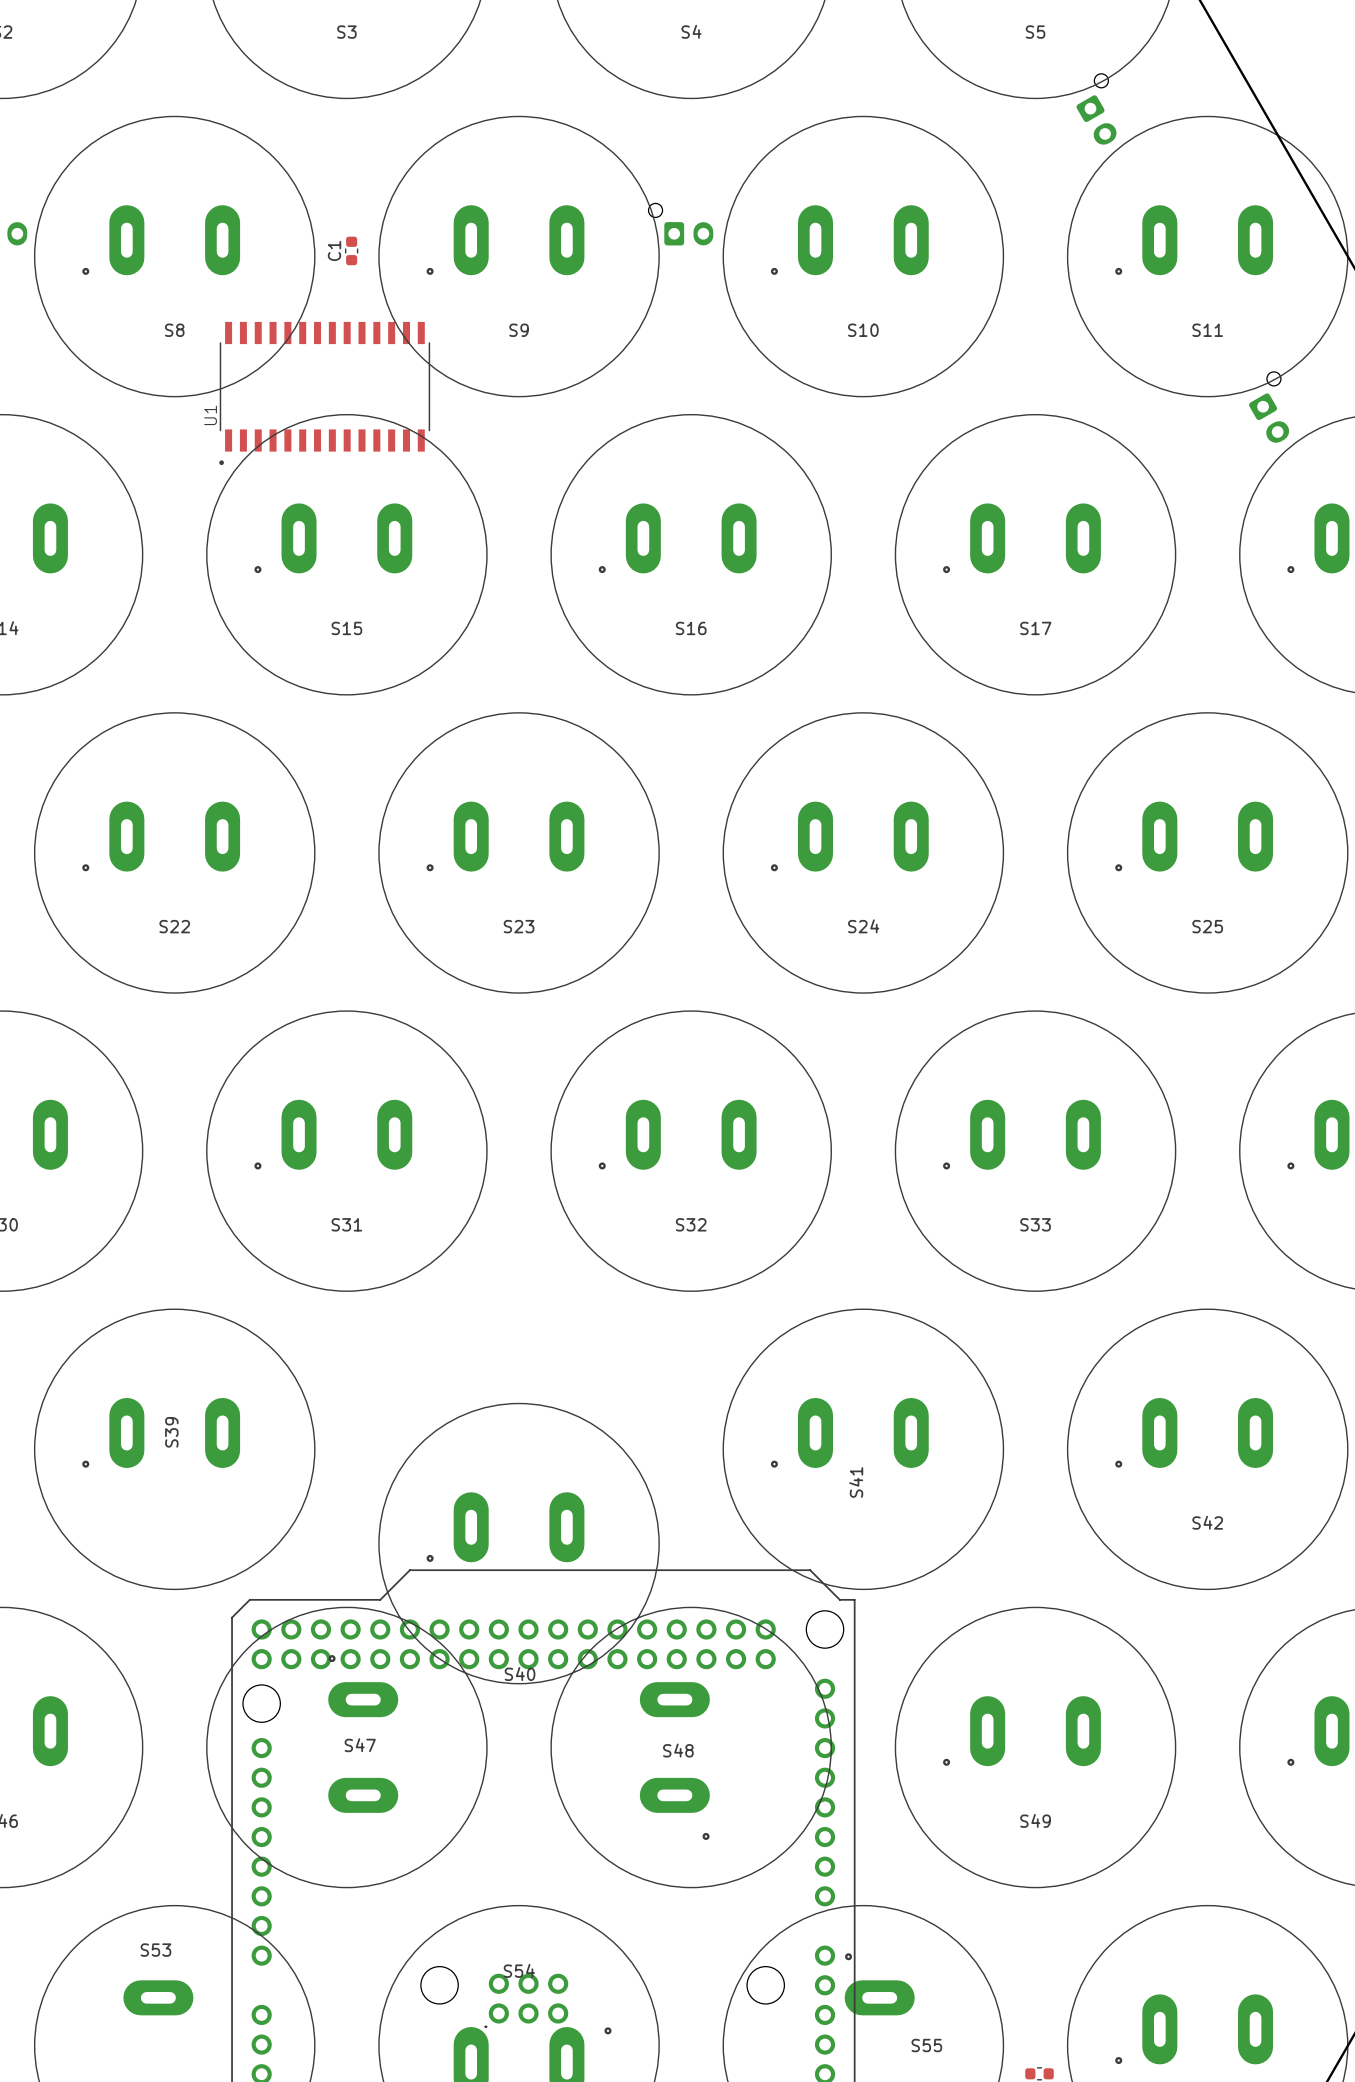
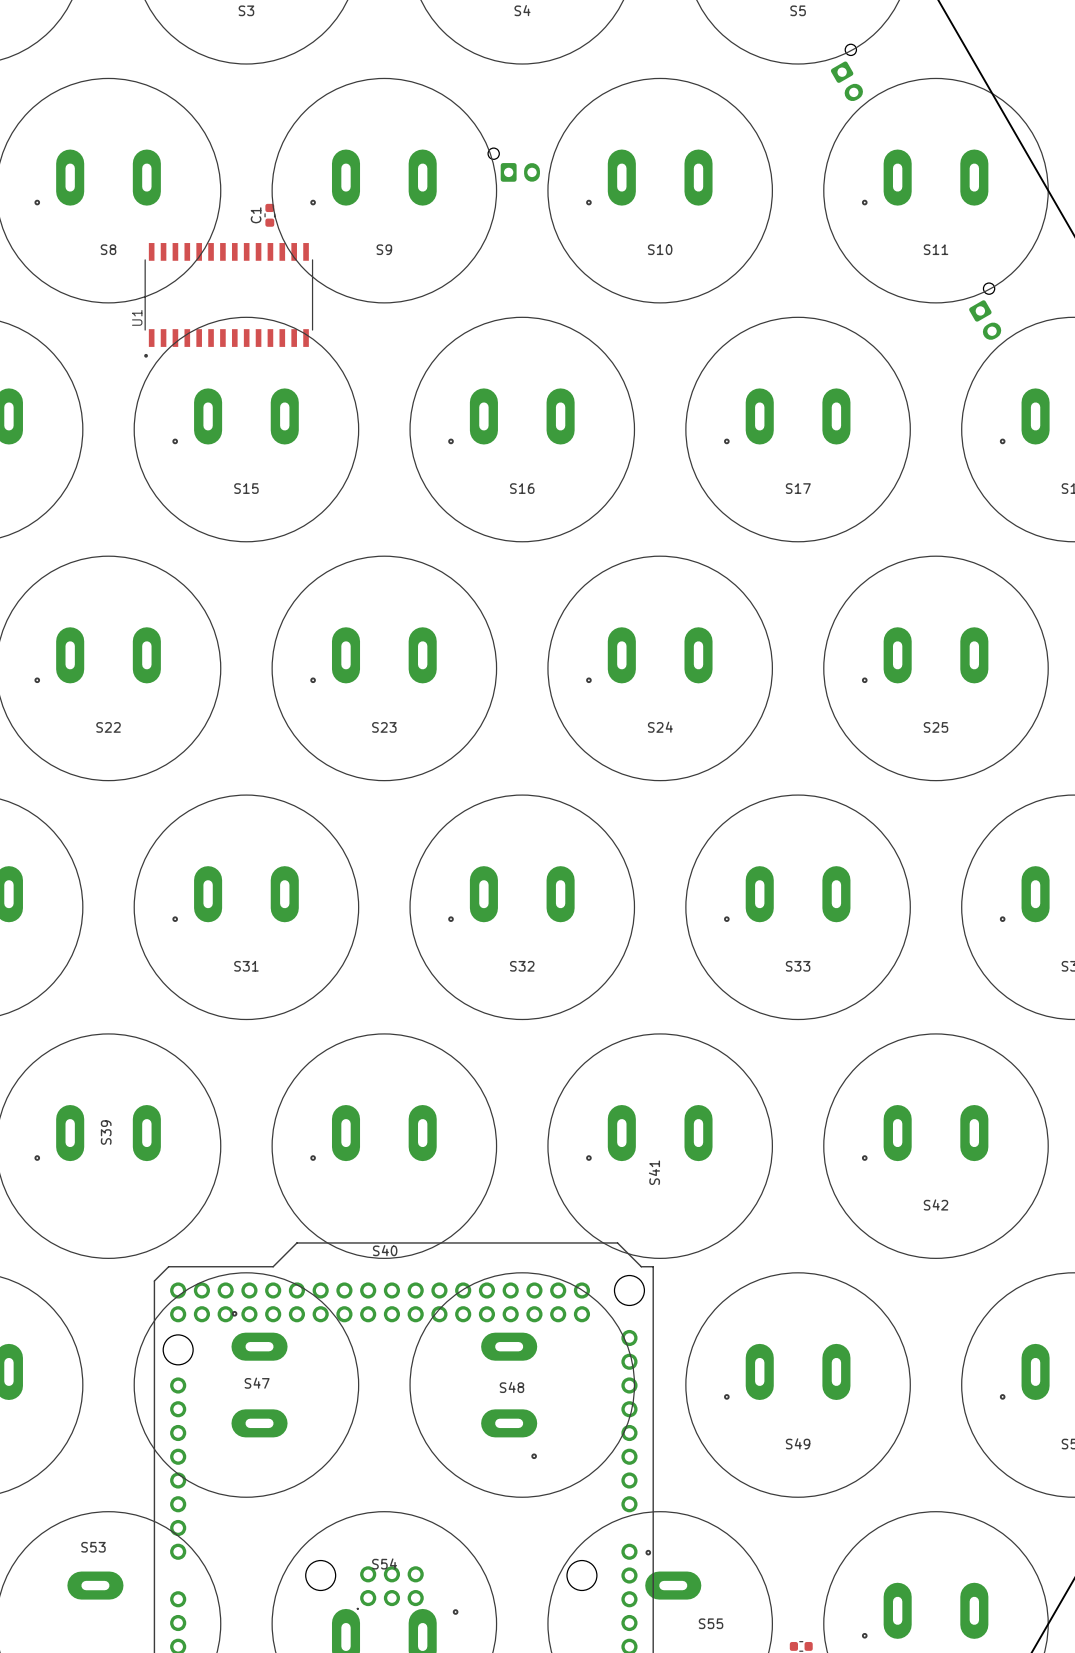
C1 position: (351, 250) -> (269, 215)
S40 position: (519, 1543) -> (384, 1146)

